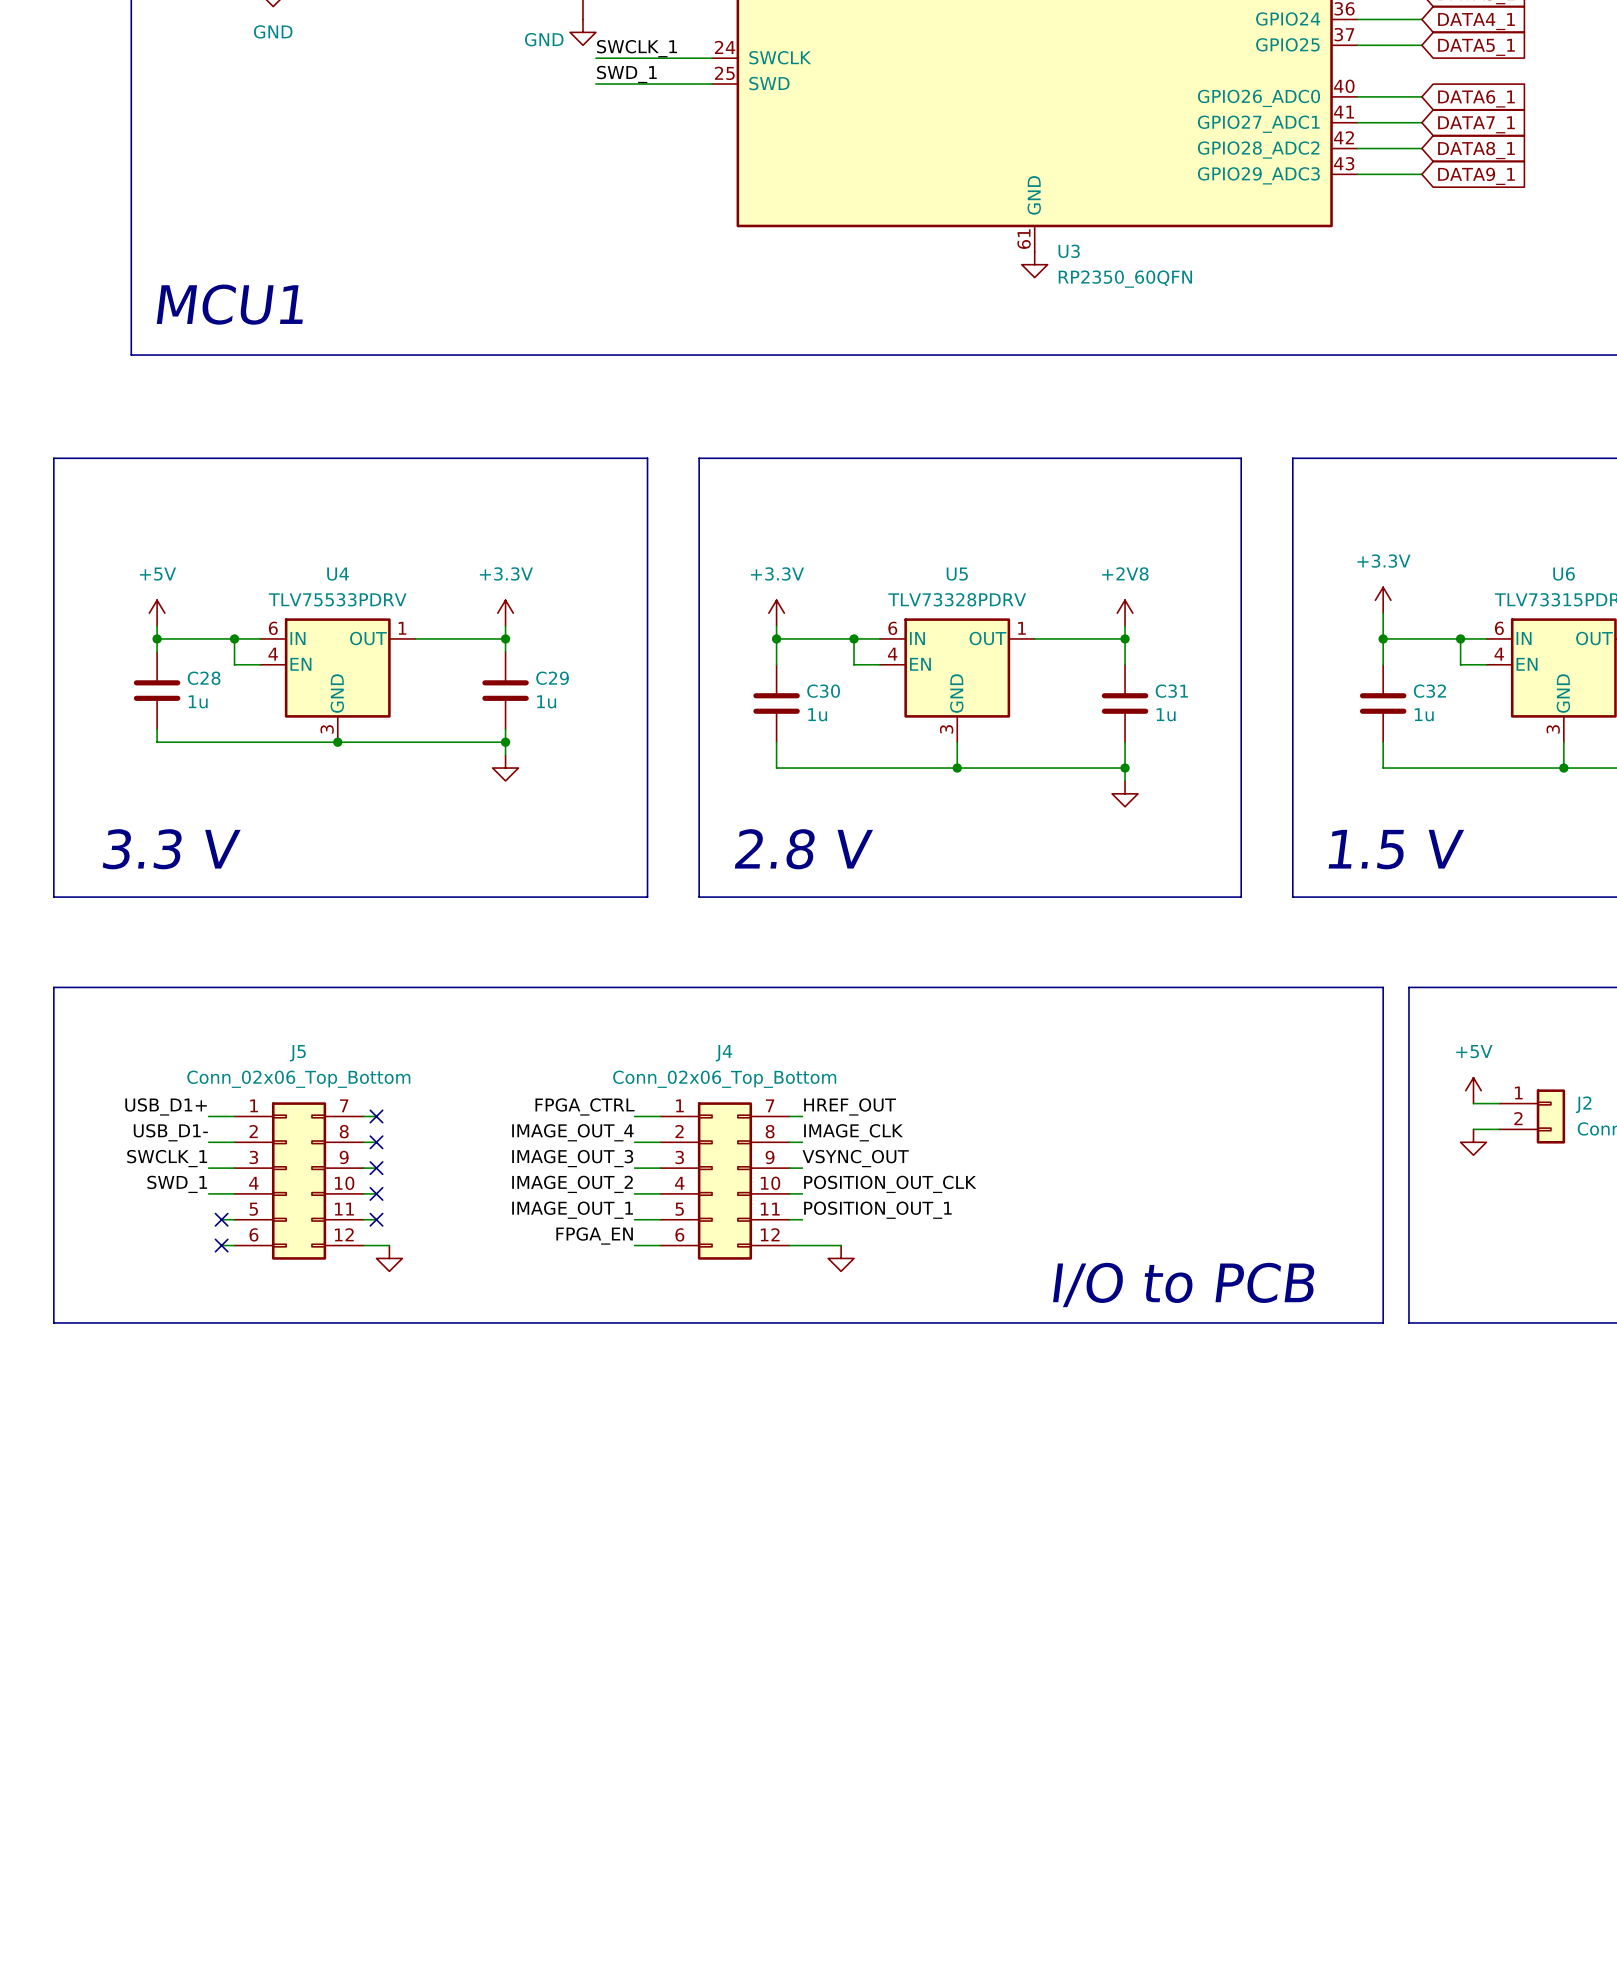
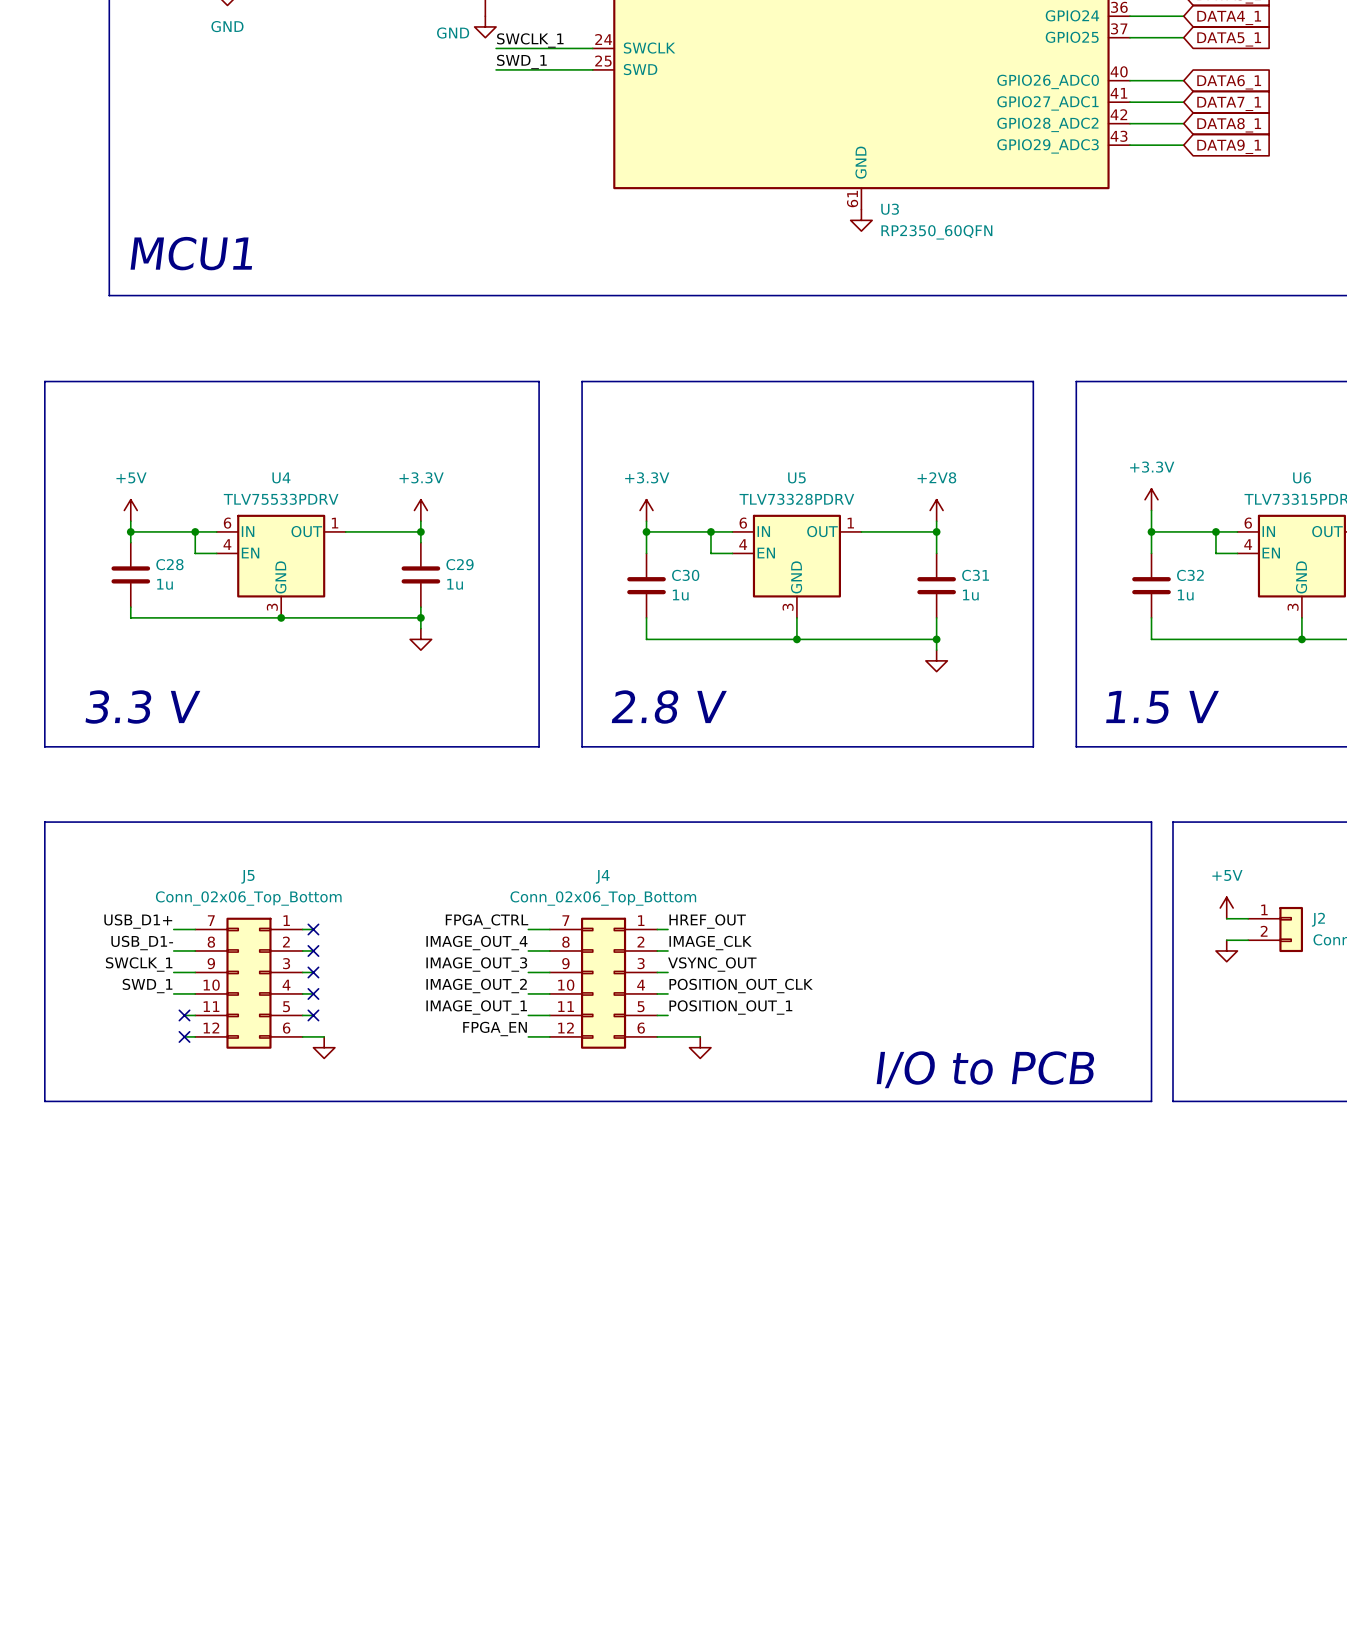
J5 flip: as is (299, 1181) -> left-right (248, 983)
J4 flip: as is (724, 1181) -> left-right (603, 983)

